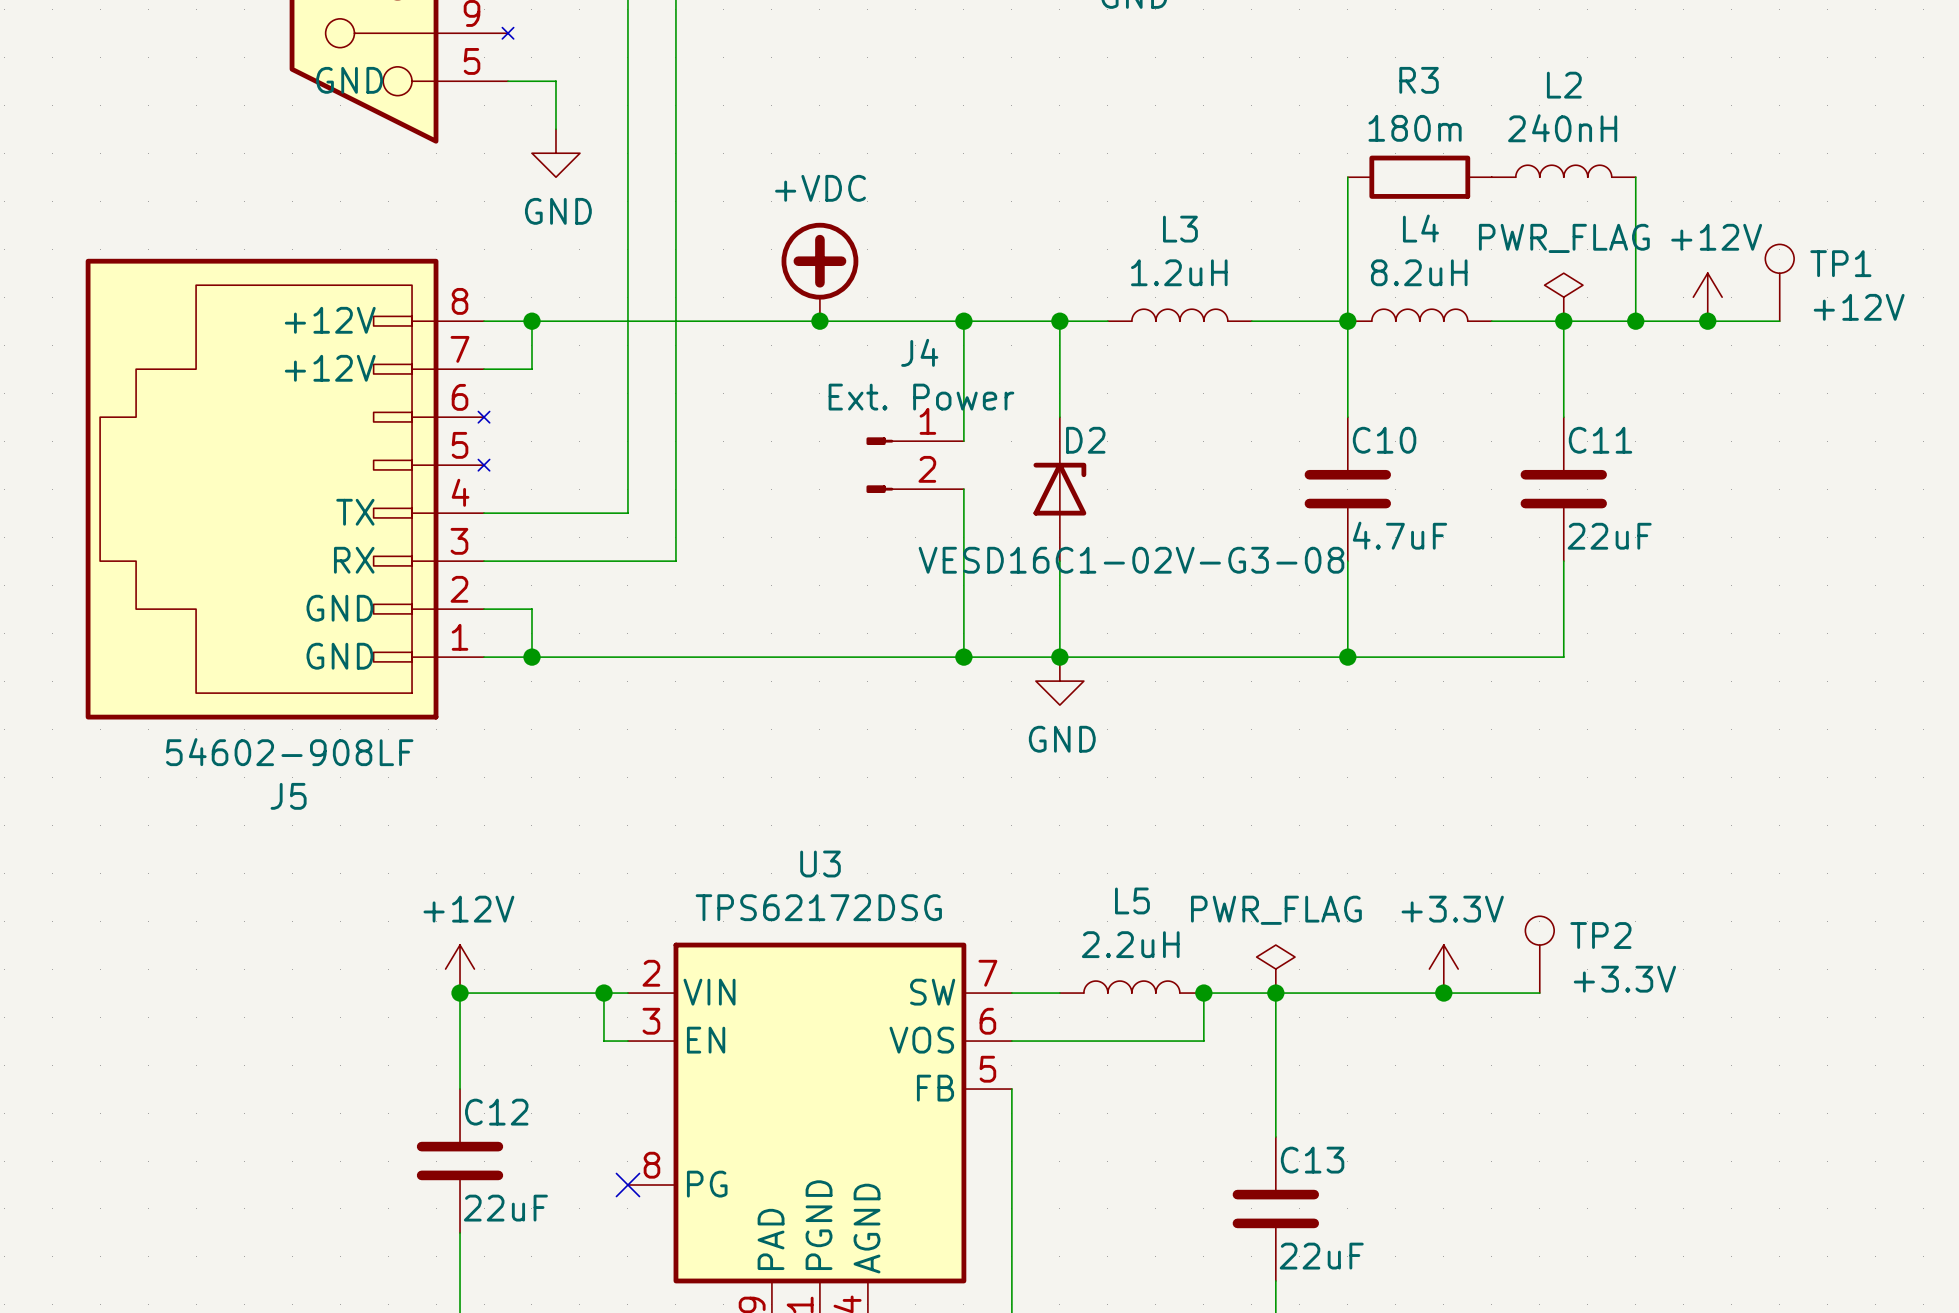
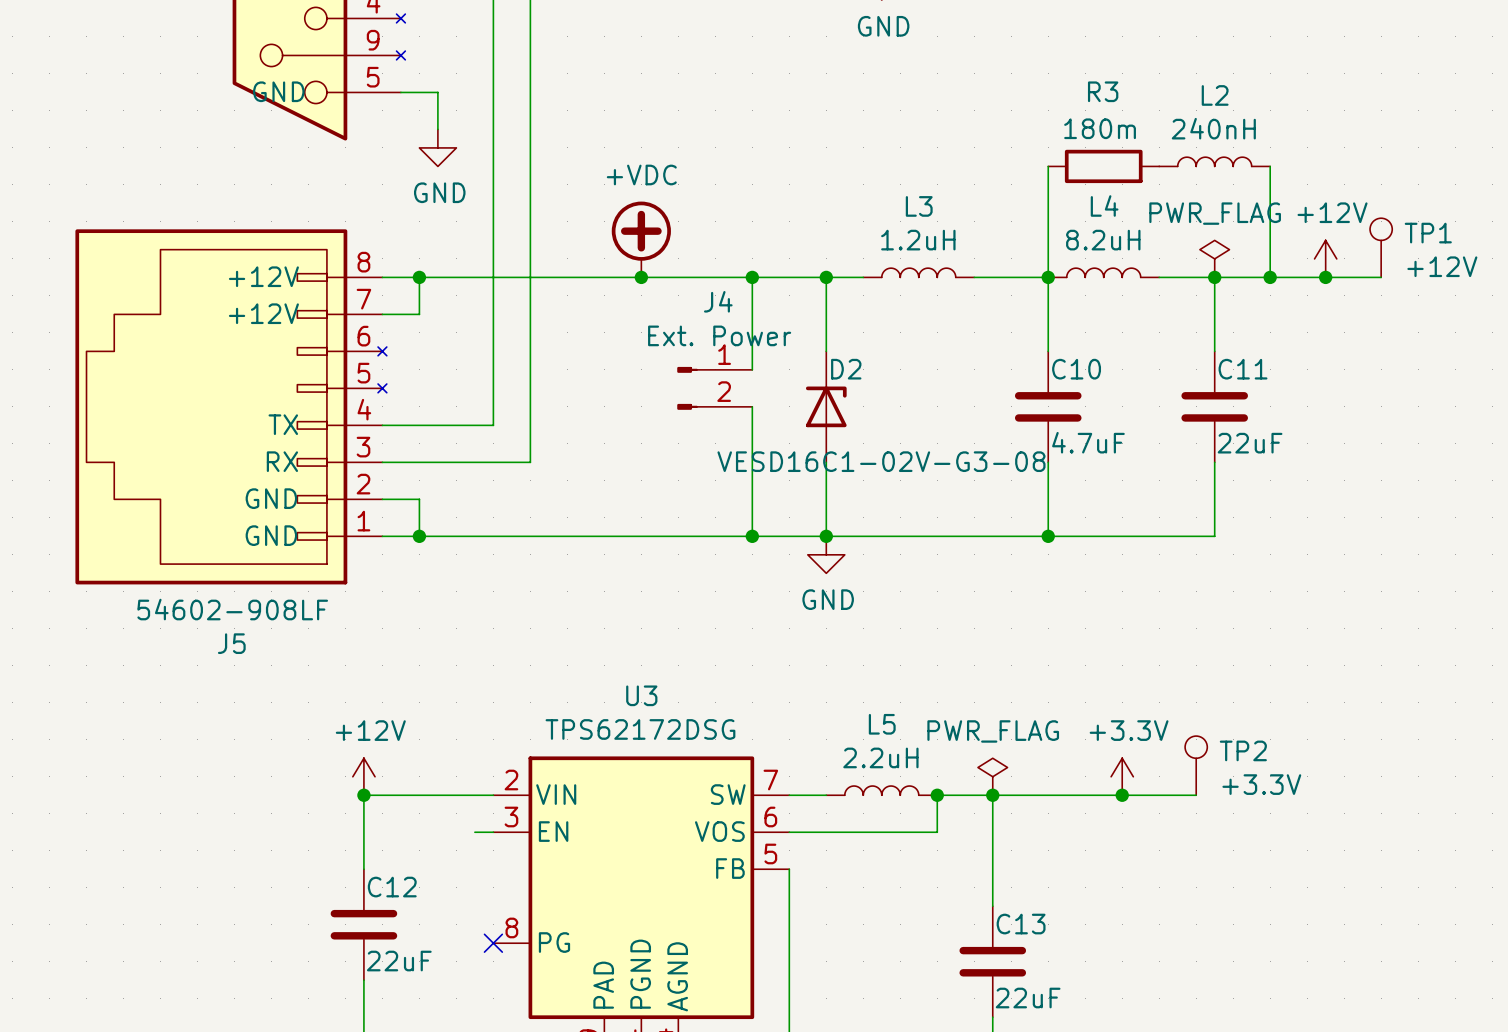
wire: (603, 993) (603, 1041) -> none
junction: (603, 993) -> none

